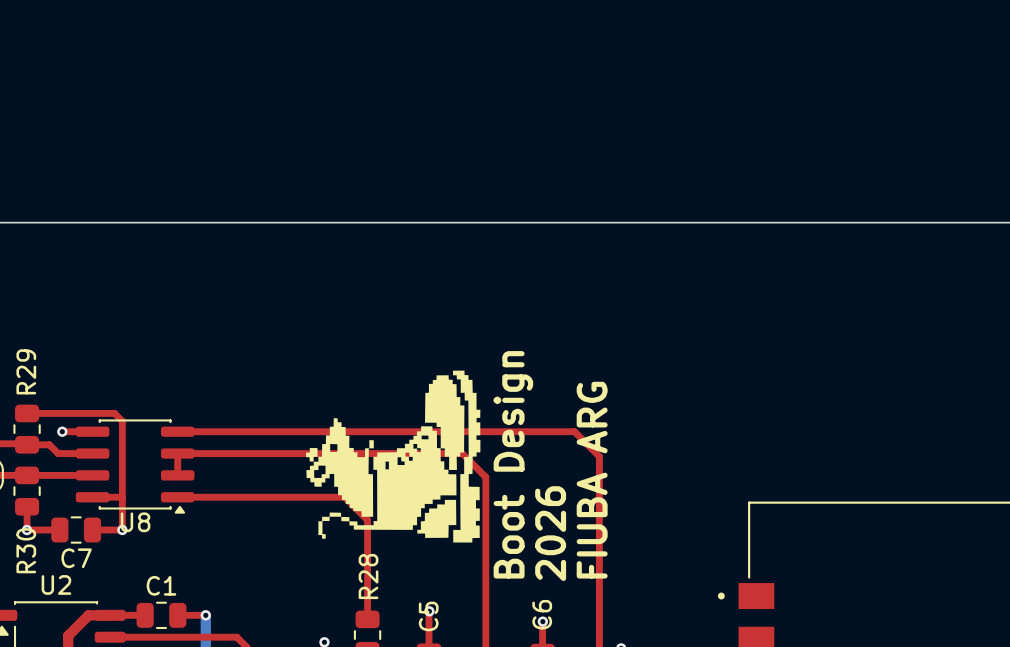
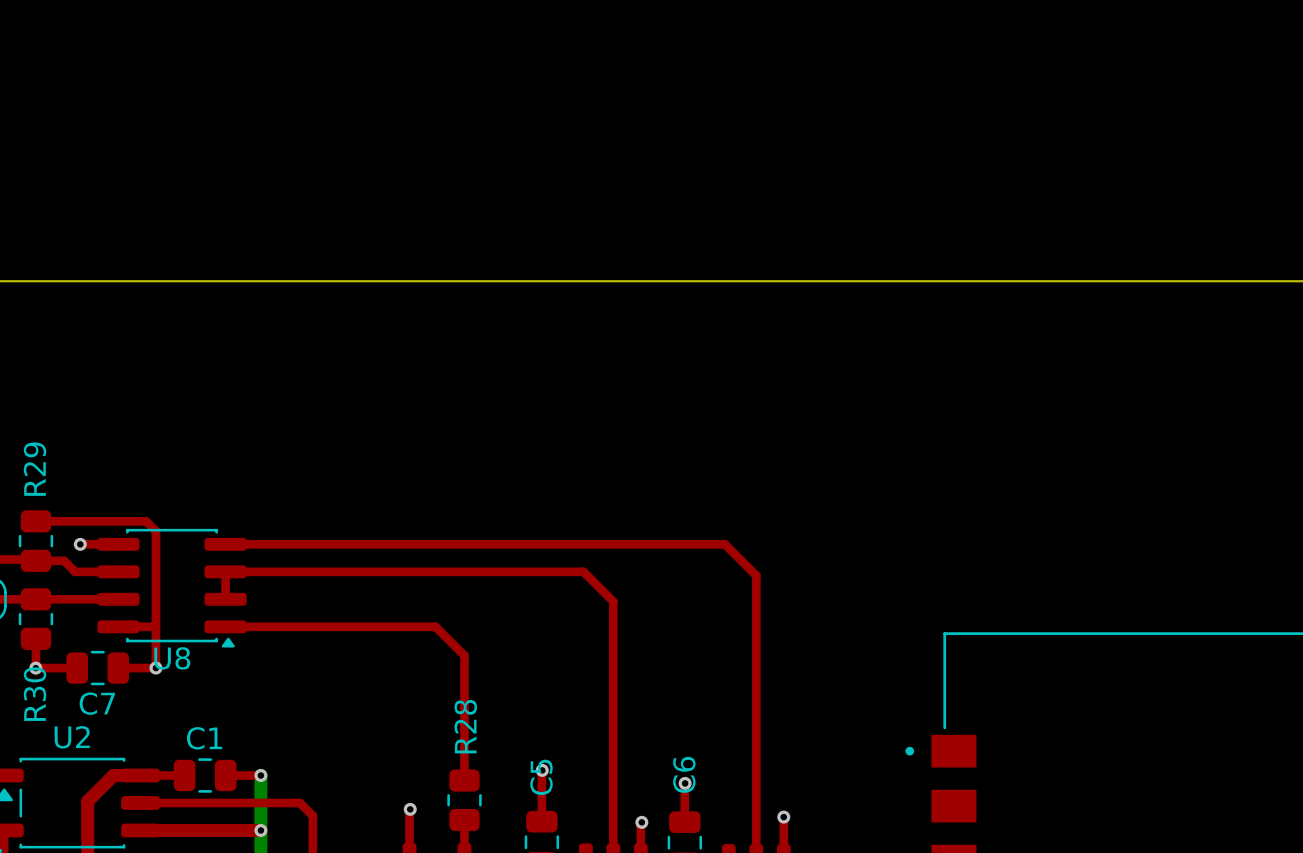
drawing: [306, 370, 481, 543] -> none
text: Boot Design (513, 464) -> none
text: FIUBA ARG (592, 480) -> none
text: 2026 (550, 533) -> none

